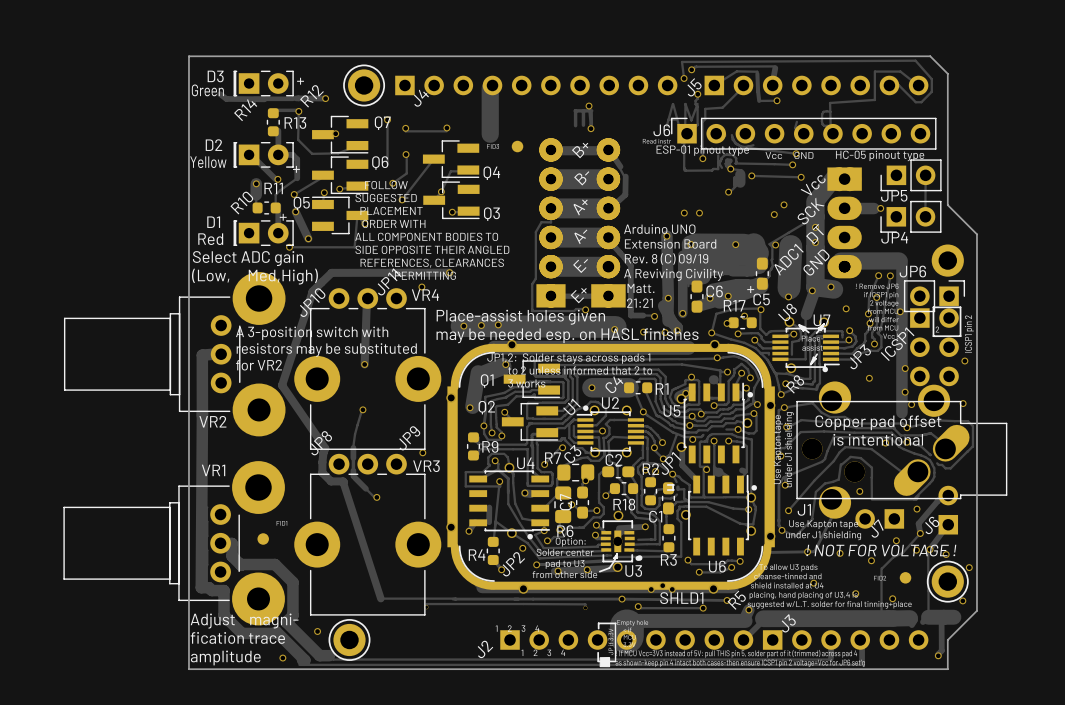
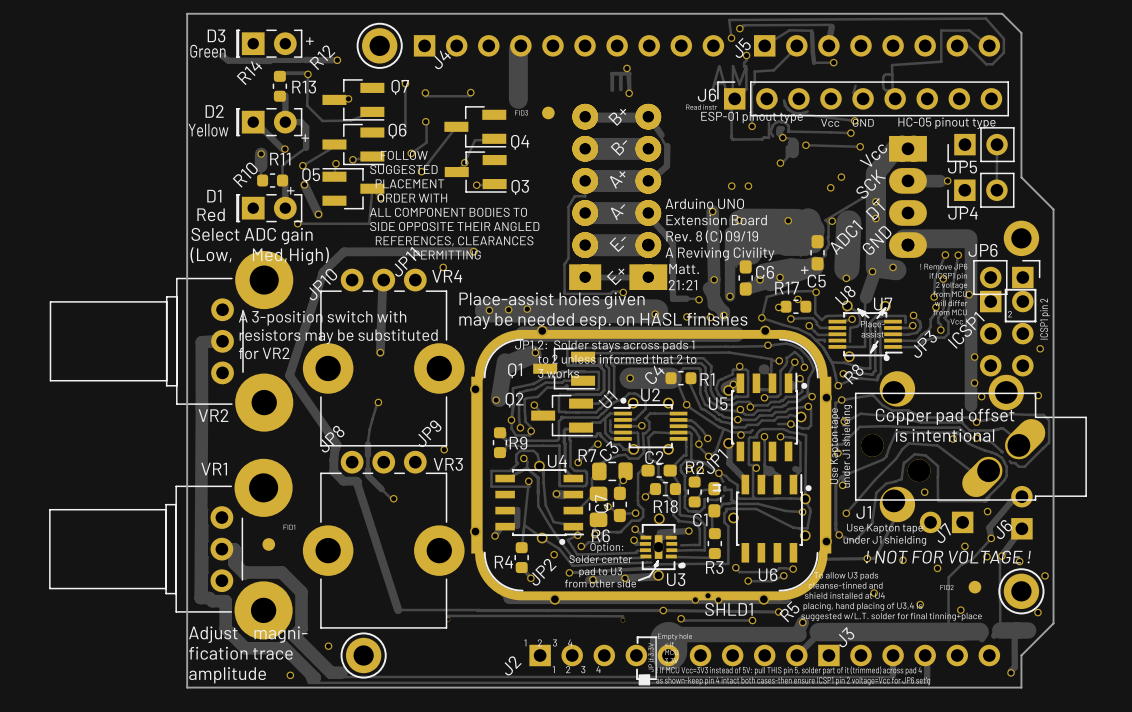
via: (846, 308) -> none
via: (869, 378) -> none

